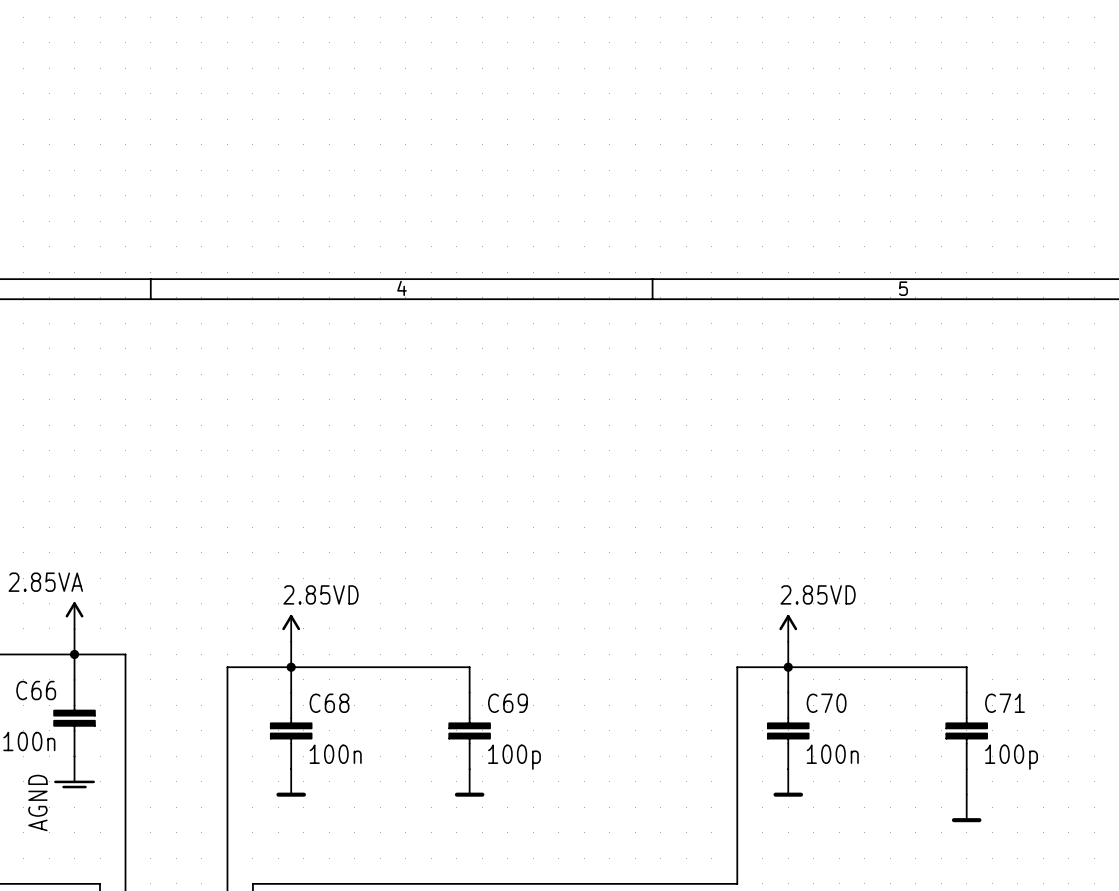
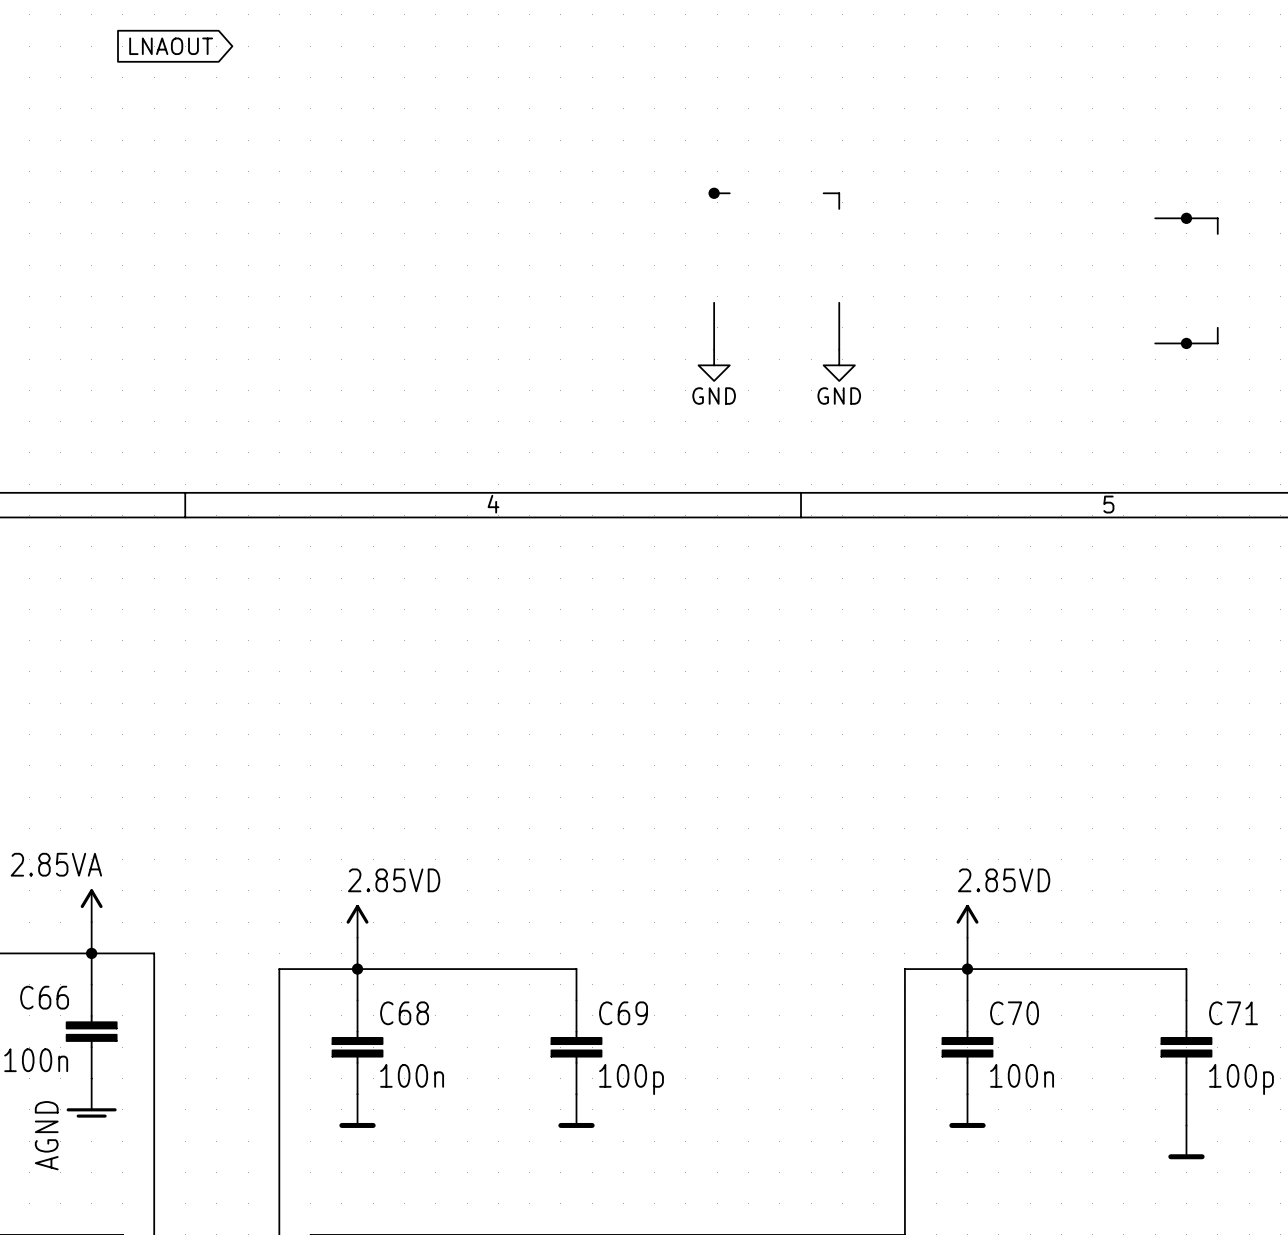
wire: none -> (714, 193) (729, 193)
junction: none -> (714, 193)
wire: none -> (823, 193) (839, 193) (839, 208)
wire: none -> (1155, 218) (1217, 218) (1217, 233)
junction: none -> (1186, 218)
wire: none -> (714, 302) (714, 349)
wire: none -> (839, 302) (839, 349)
wire: none -> (1217, 327) (1217, 343) (1155, 343)
junction: none -> (1186, 343)
power symbol: none -> GND (714, 365)
power symbol: none -> GND (839, 365)

